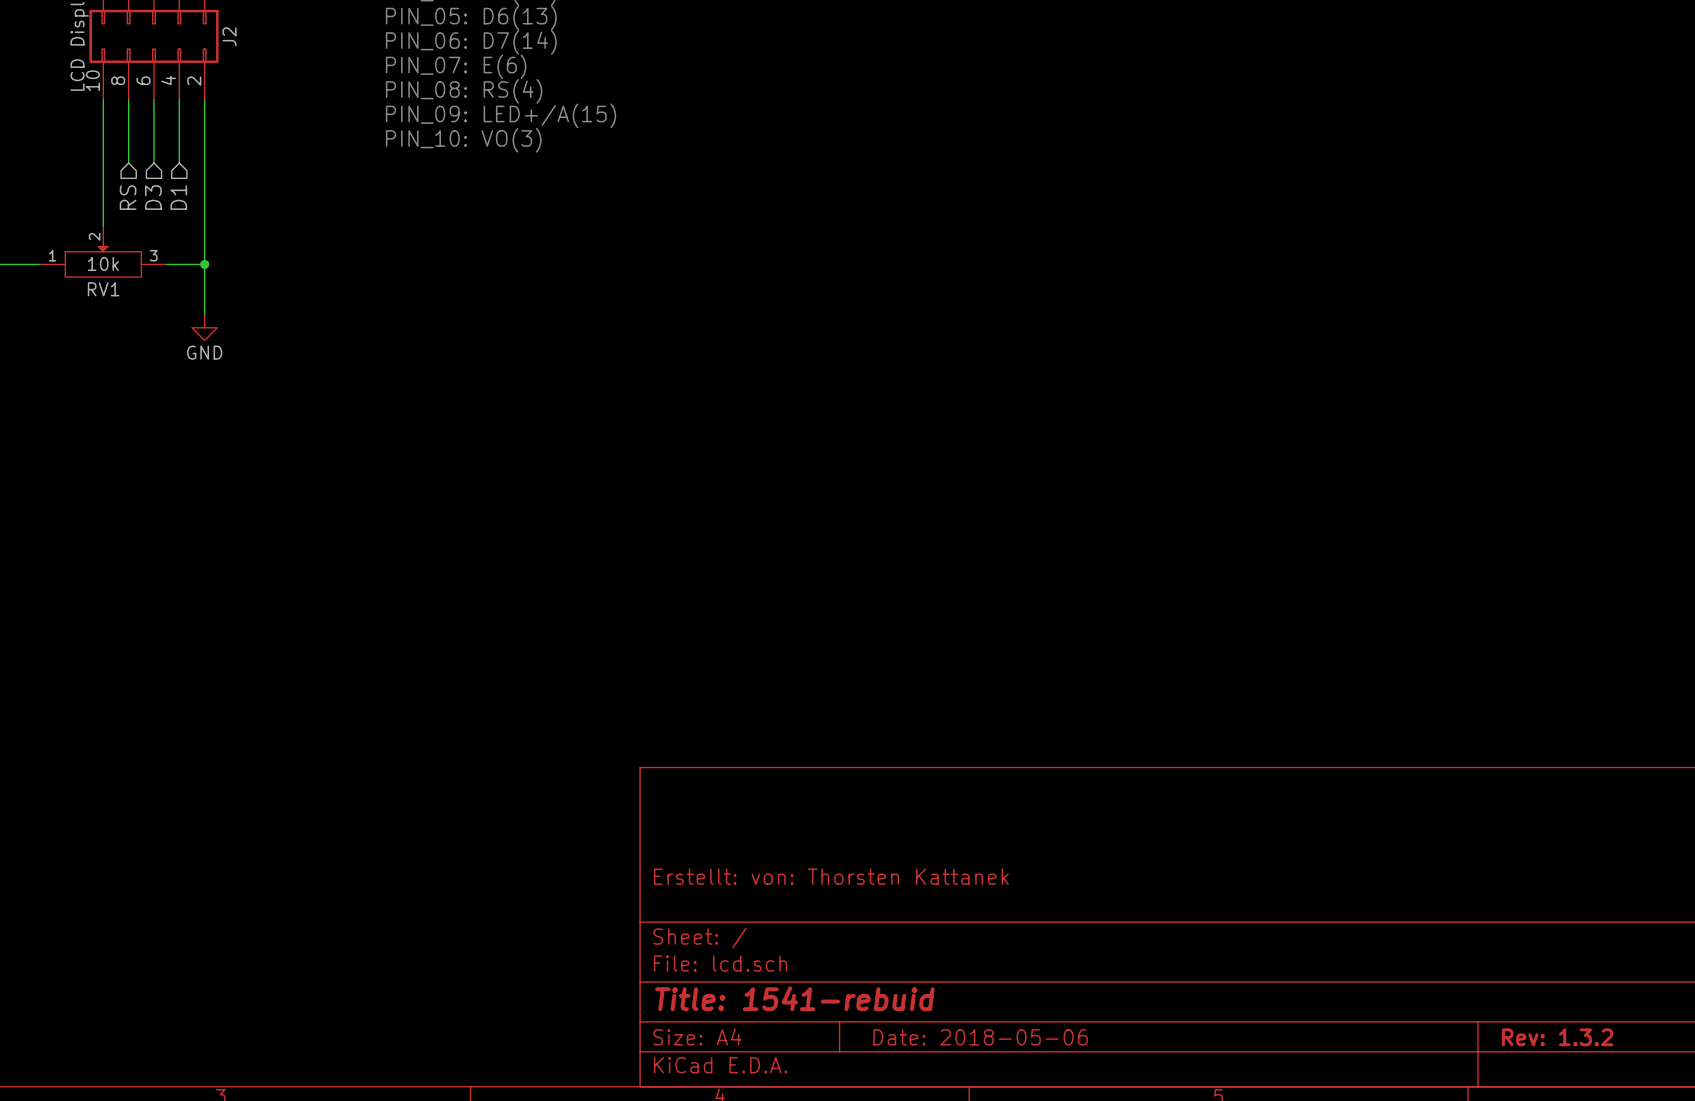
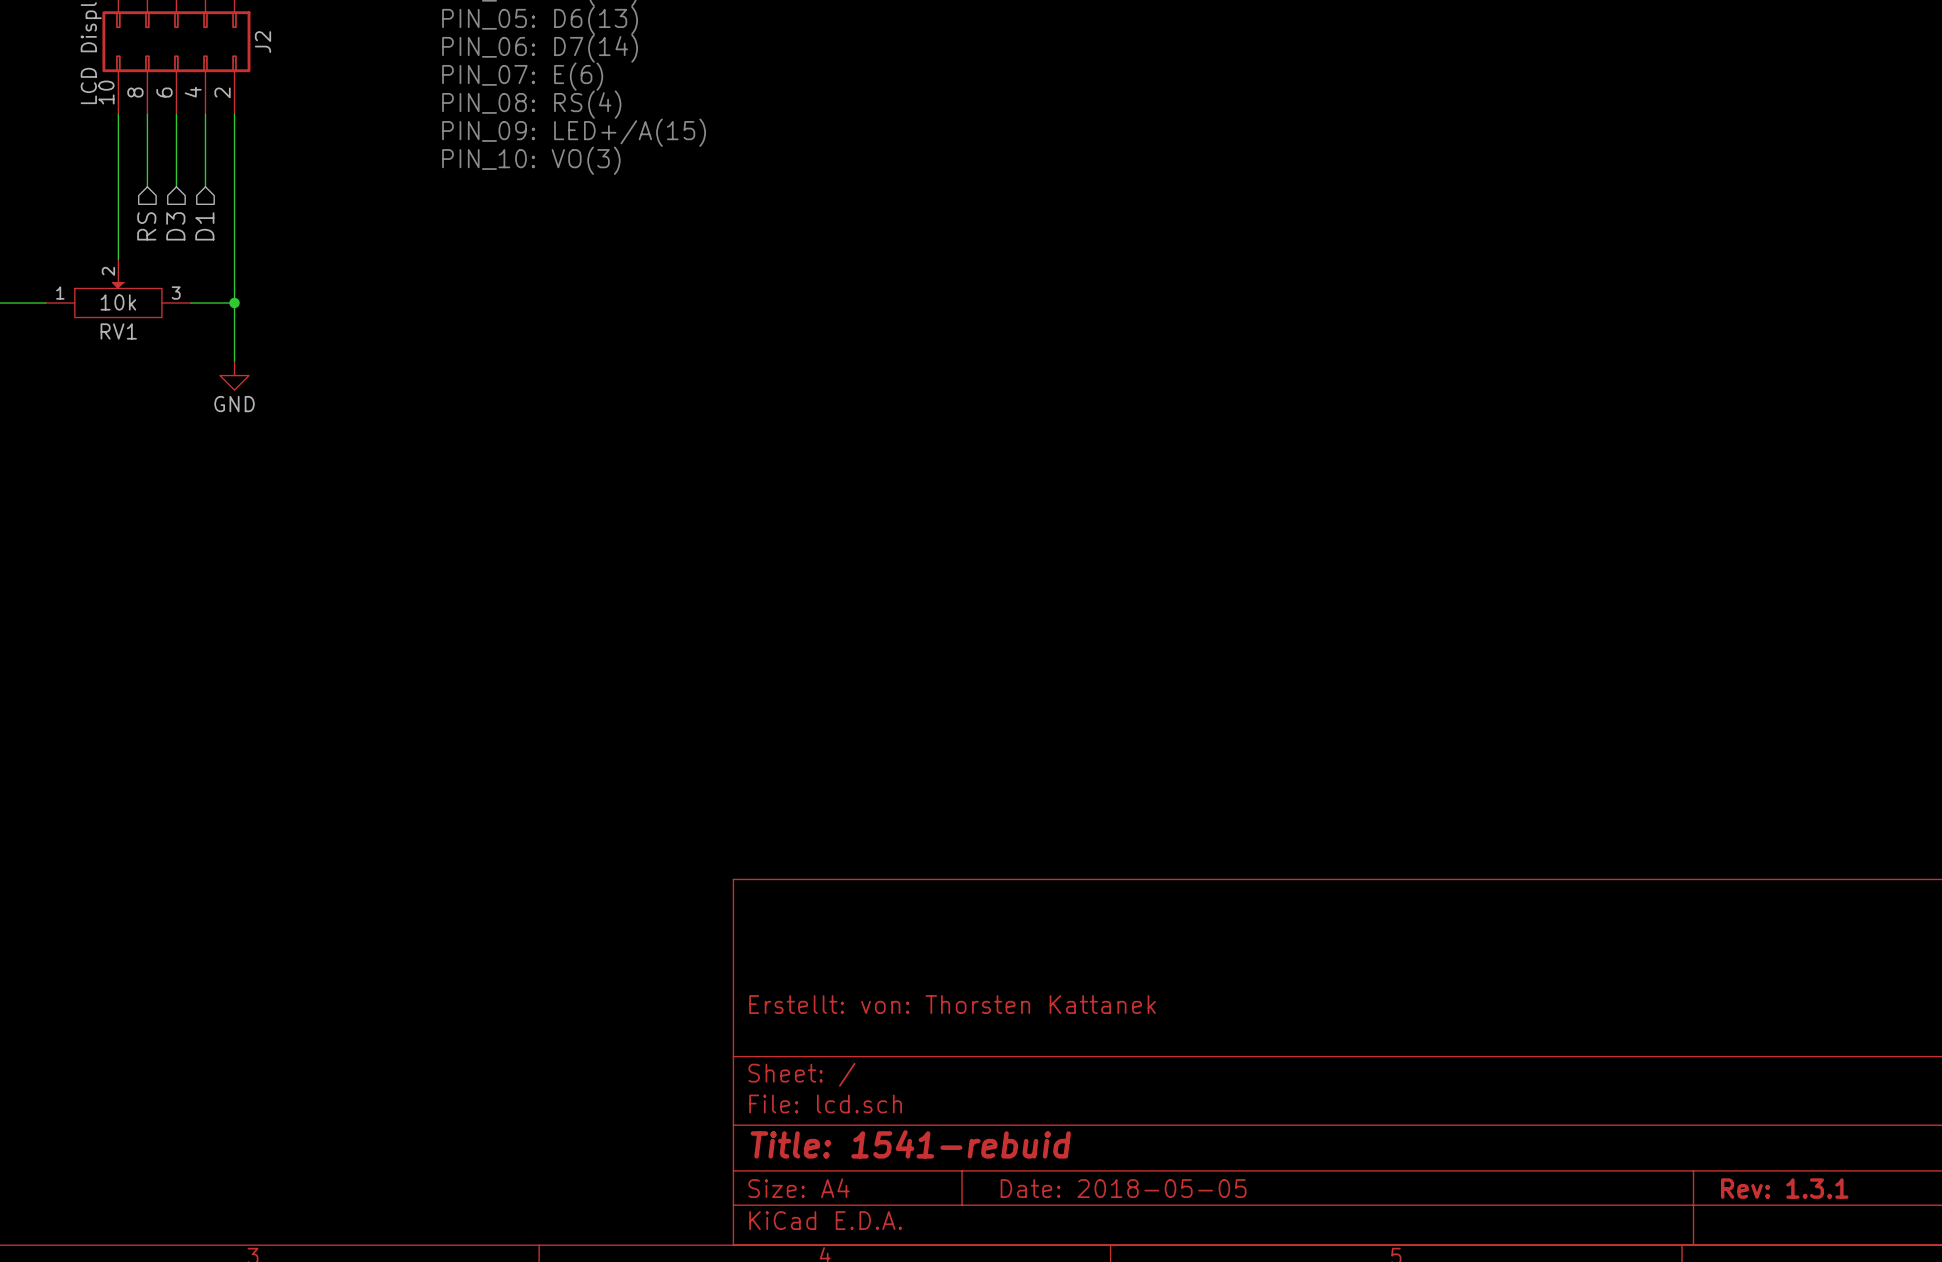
title block: Date: 2018-05-06 (980, 1037) -> Date: 2018-05-05 (1123, 1188)
title block: Rev: 1.3.2 (1557, 1037) -> Rev: 1.3.1 (1784, 1188)

